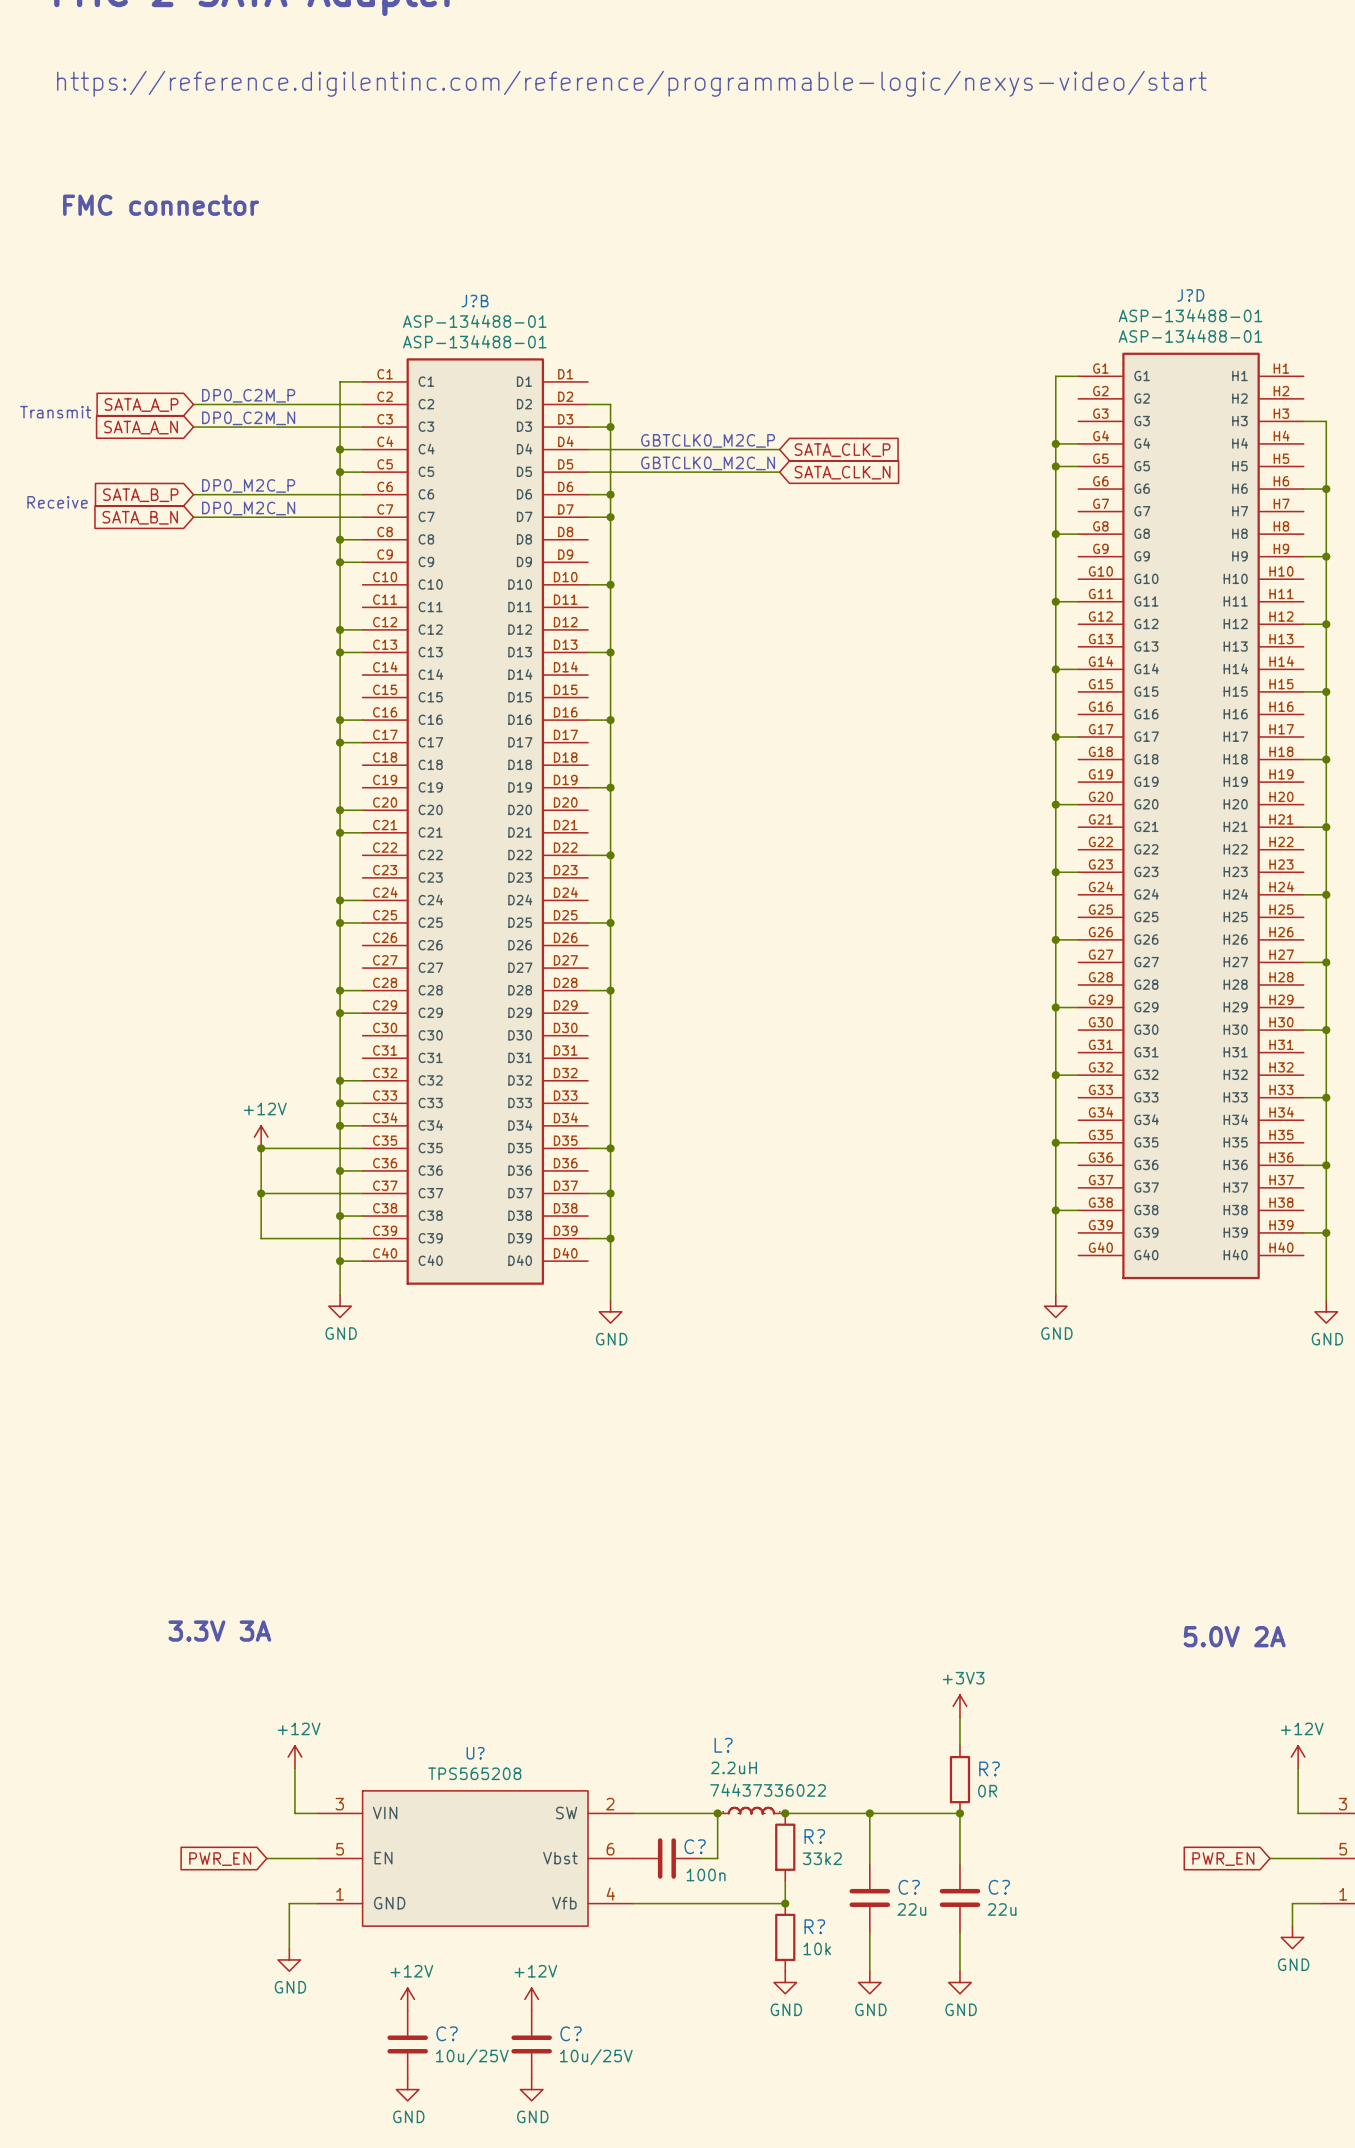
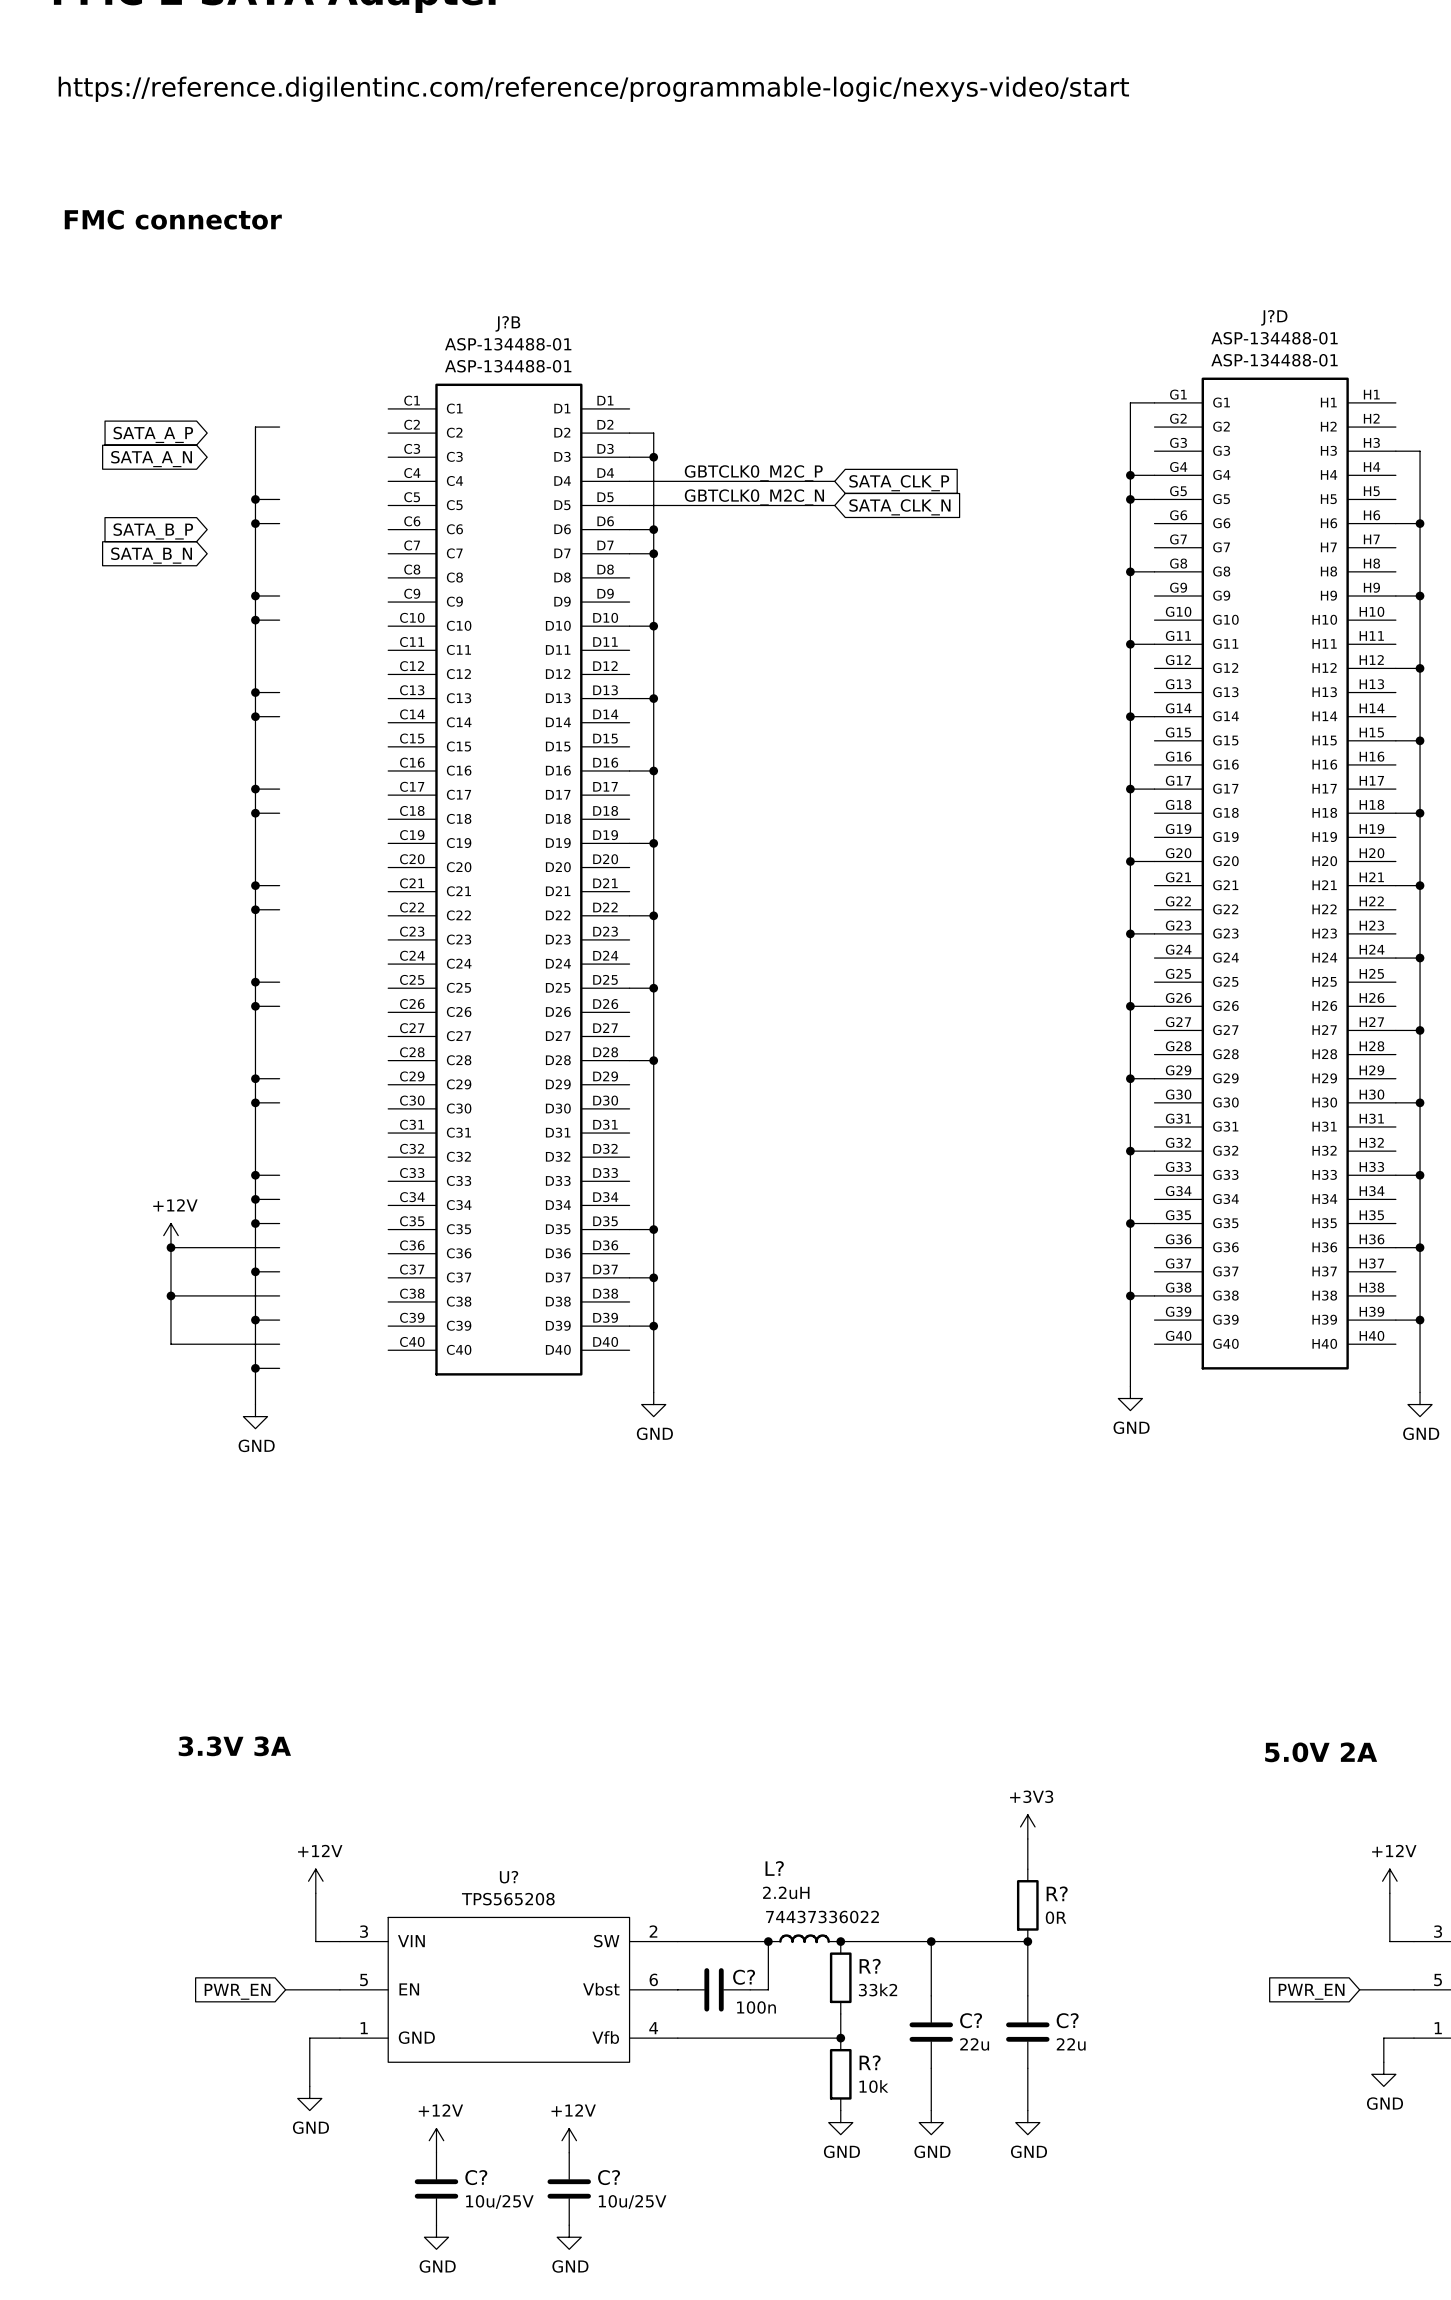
wire: (362, 381) (340, 381) (340, 1294) -> (279, 427) (255, 427) (255, 1404)
text: DP0_C2M_P (248, 395) -> none
wire: (193, 404) (362, 404) -> none
text: Transmit (55, 412) -> none
text: DP0_C2M_N (248, 418) -> none
wire: (193, 427) (362, 427) -> none
wire: (340, 449) (362, 449) -> (255, 499) (279, 499)
junction: (340, 449) -> none
junction: none -> (255, 499)
wire: (340, 472) (362, 472) -> (255, 523) (279, 523)
junction: (340, 472) -> none
text: DP0_M2C_P (248, 485) -> none
junction: none -> (255, 523)
wire: (193, 494) (362, 494) -> none
text: Receive (57, 502) -> none
text: DP0_M2C_N (248, 508) -> none
wire: (193, 517) (362, 517) -> none
wire: (340, 539) (362, 539) -> (255, 596) (279, 596)
junction: (340, 539) -> none
junction: none -> (255, 596)
wire: (340, 562) (362, 562) -> (255, 620) (279, 620)
junction: (340, 562) -> none
junction: none -> (255, 620)
wire: (340, 629) (362, 629) -> (255, 692) (279, 692)
junction: (340, 629) -> none
junction: none -> (255, 692)
wire: (340, 652) (362, 652) -> (255, 716) (279, 716)
junction: (340, 652) -> none
junction: none -> (255, 716)
wire: (340, 720) (362, 720) -> (255, 789) (279, 789)
junction: (340, 720) -> none
junction: none -> (255, 789)
wire: (340, 742) (362, 742) -> (255, 813) (279, 813)
junction: (340, 742) -> none
junction: none -> (255, 813)
wire: (340, 810) (362, 810) -> (255, 885) (279, 885)
junction: (340, 810) -> none
junction: none -> (255, 885)
wire: (340, 832) (362, 832) -> (255, 909) (279, 909)
junction: (340, 832) -> none
junction: none -> (255, 909)
wire: (340, 900) (362, 900) -> (255, 982) (279, 982)
junction: (340, 900) -> none
junction: none -> (255, 982)
wire: (340, 922) (362, 922) -> (255, 1006) (279, 1006)
junction: (340, 922) -> none
junction: none -> (255, 1006)
wire: (340, 990) (362, 990) -> (255, 1078) (279, 1078)
junction: (340, 990) -> none
junction: none -> (255, 1078)
wire: (340, 1013) (362, 1013) -> (255, 1102) (279, 1102)
junction: (340, 1013) -> none
junction: none -> (255, 1102)
wire: (340, 1080) (362, 1080) -> (255, 1175) (279, 1175)
junction: (340, 1080) -> none
junction: none -> (255, 1175)
wire: (340, 1103) (362, 1103) -> (255, 1199) (279, 1199)
junction: (340, 1103) -> none
junction: none -> (255, 1199)
wire: (340, 1125) (362, 1125) -> (255, 1223) (279, 1223)
junction: (340, 1125) -> none
power symbol position: +12V (261, 1137) -> +12V (170, 1235)
junction: none -> (255, 1223)
junction: (261, 1148) -> none
wire: (362, 1148) (261, 1148) (261, 1238) (362, 1238) -> (279, 1247) (170, 1247) (170, 1344) (279, 1344)
junction: none -> (170, 1247)
wire: (340, 1170) (362, 1170) -> (255, 1271) (279, 1271)
junction: (340, 1170) -> none
junction: none -> (255, 1271)
wire: (261, 1193) (362, 1193) -> (170, 1295) (279, 1295)
junction: (261, 1193) -> none
junction: none -> (170, 1295)
wire: (340, 1216) (362, 1216) -> (255, 1320) (279, 1320)
junction: (340, 1216) -> none
junction: none -> (255, 1320)
wire: (340, 1261) (362, 1261) -> (255, 1368) (279, 1368)
junction: (340, 1261) -> none
junction: none -> (255, 1368)
power symbol position: GND (340, 1306) -> GND (255, 1416)

